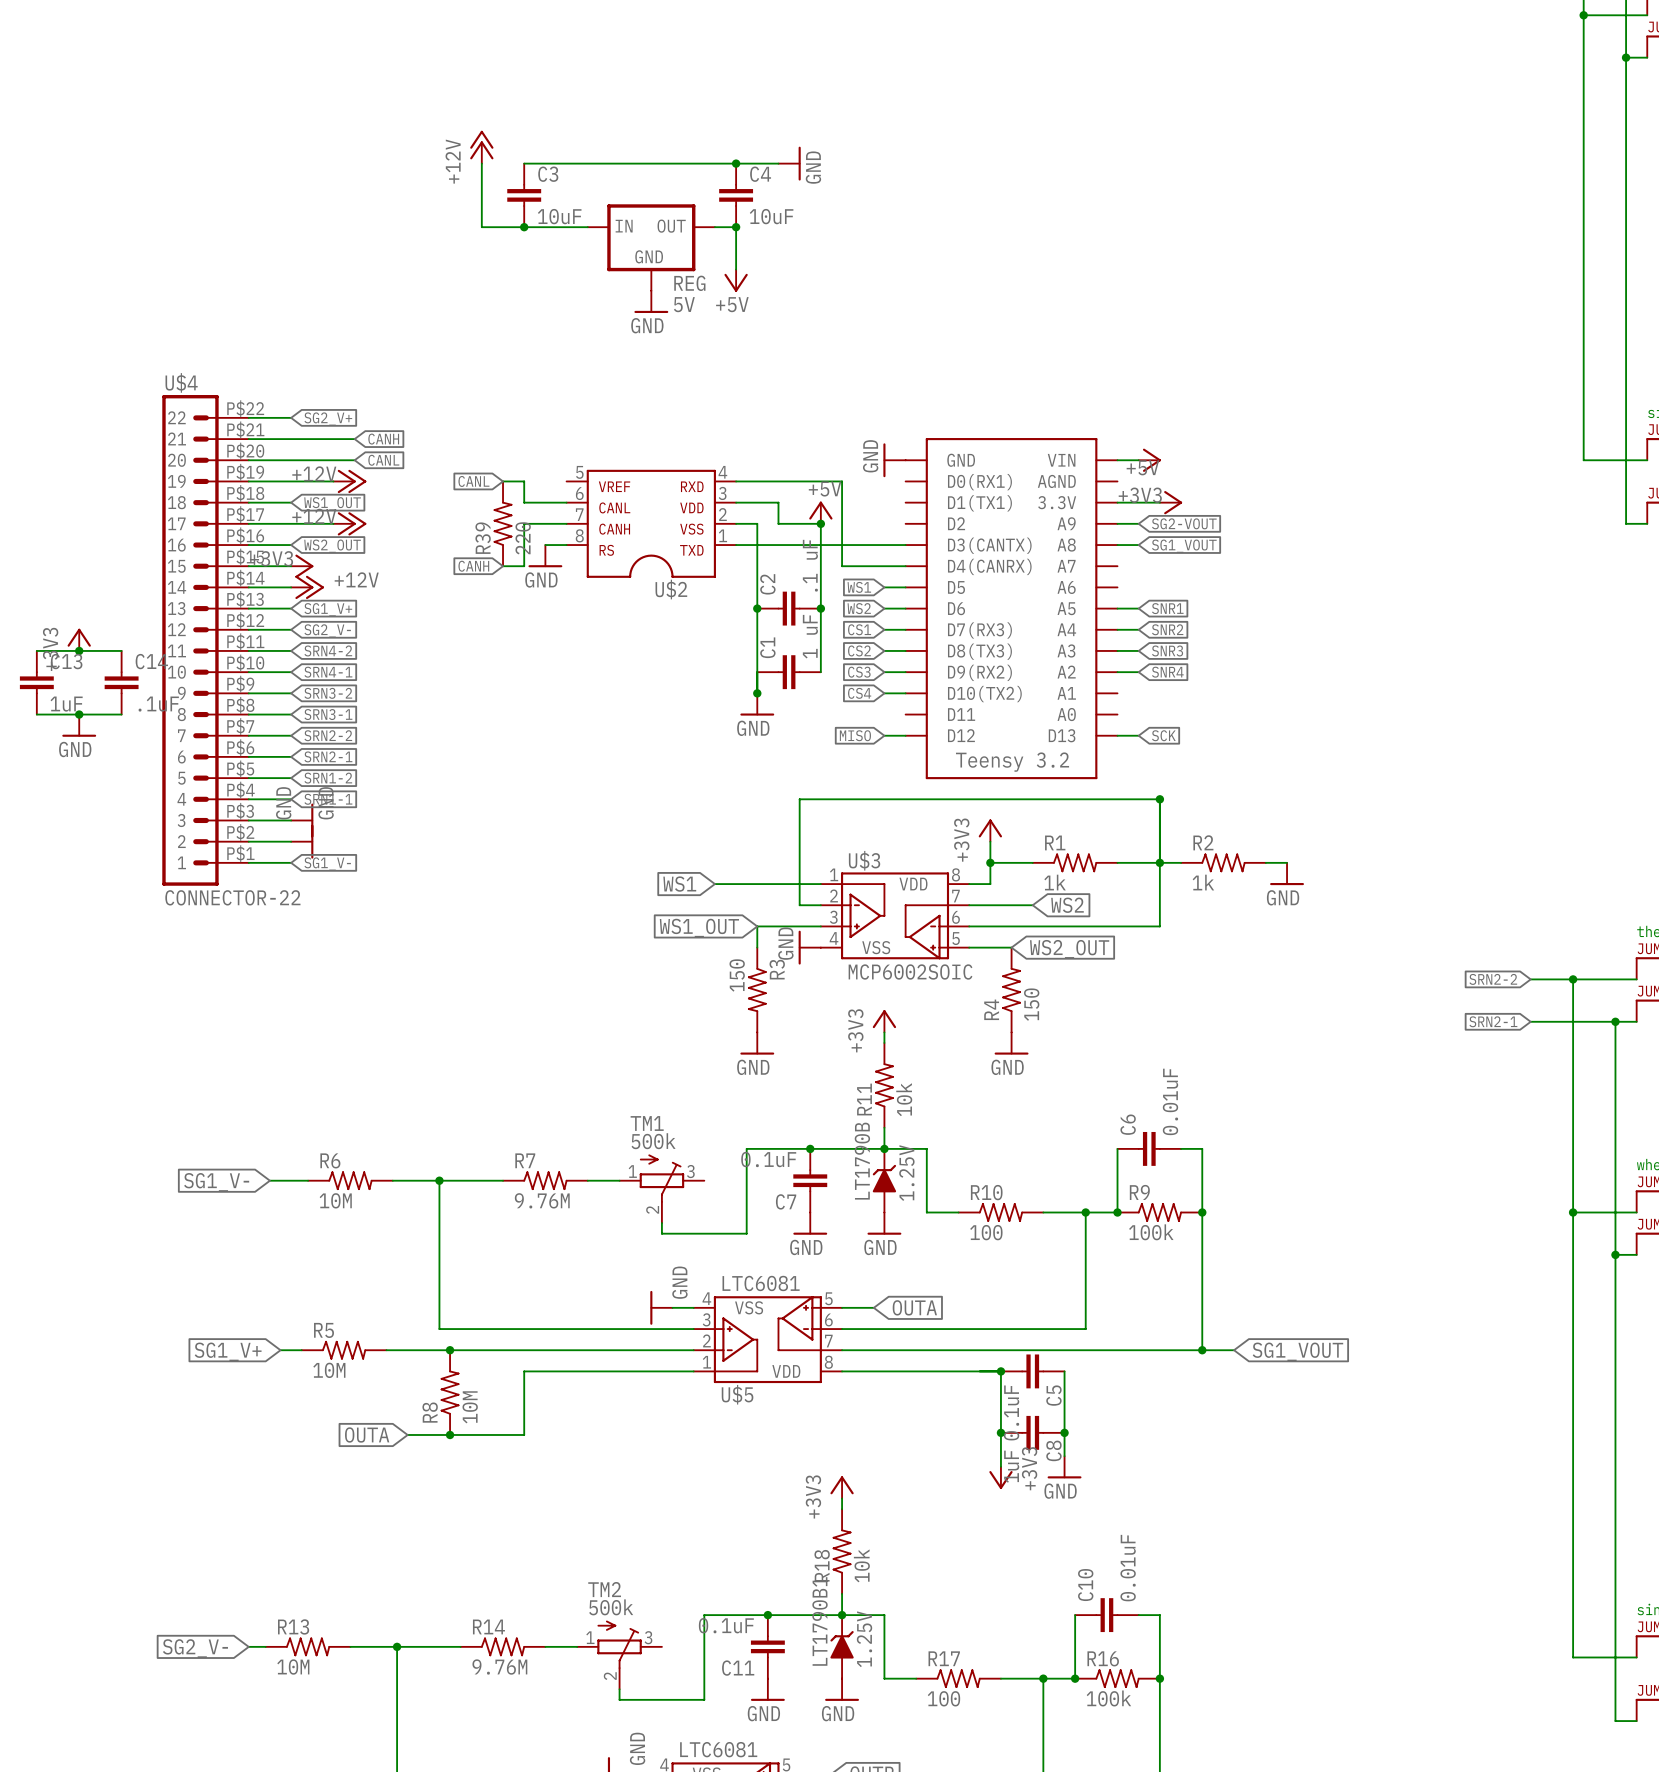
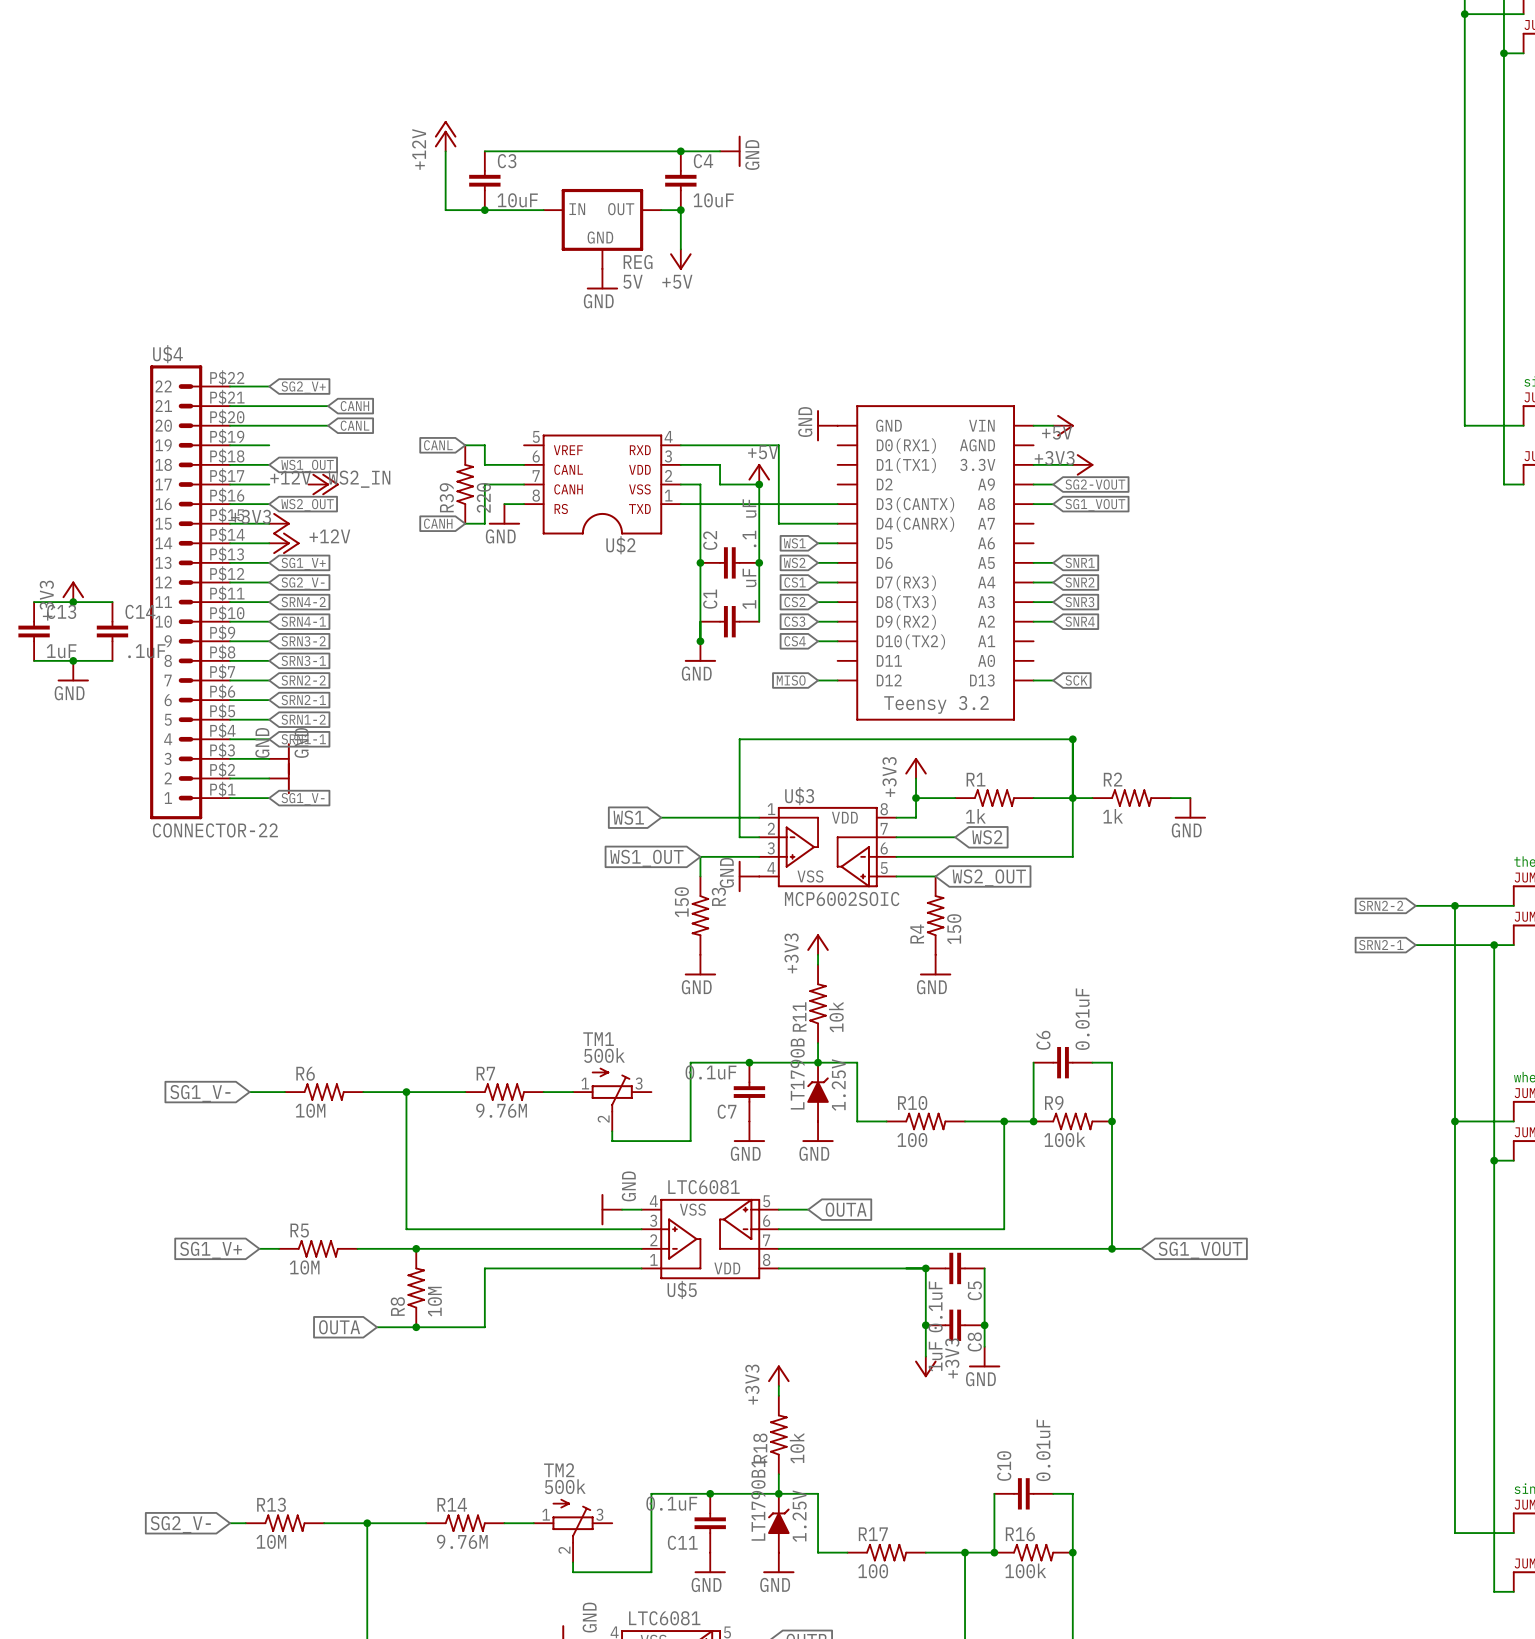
wire: (291, 481) (333, 481) -> none
power symbol: +12V (349, 481) -> none
label: none -> WS2_IN (359, 479)
wire: (291, 523) (333, 523) -> none

